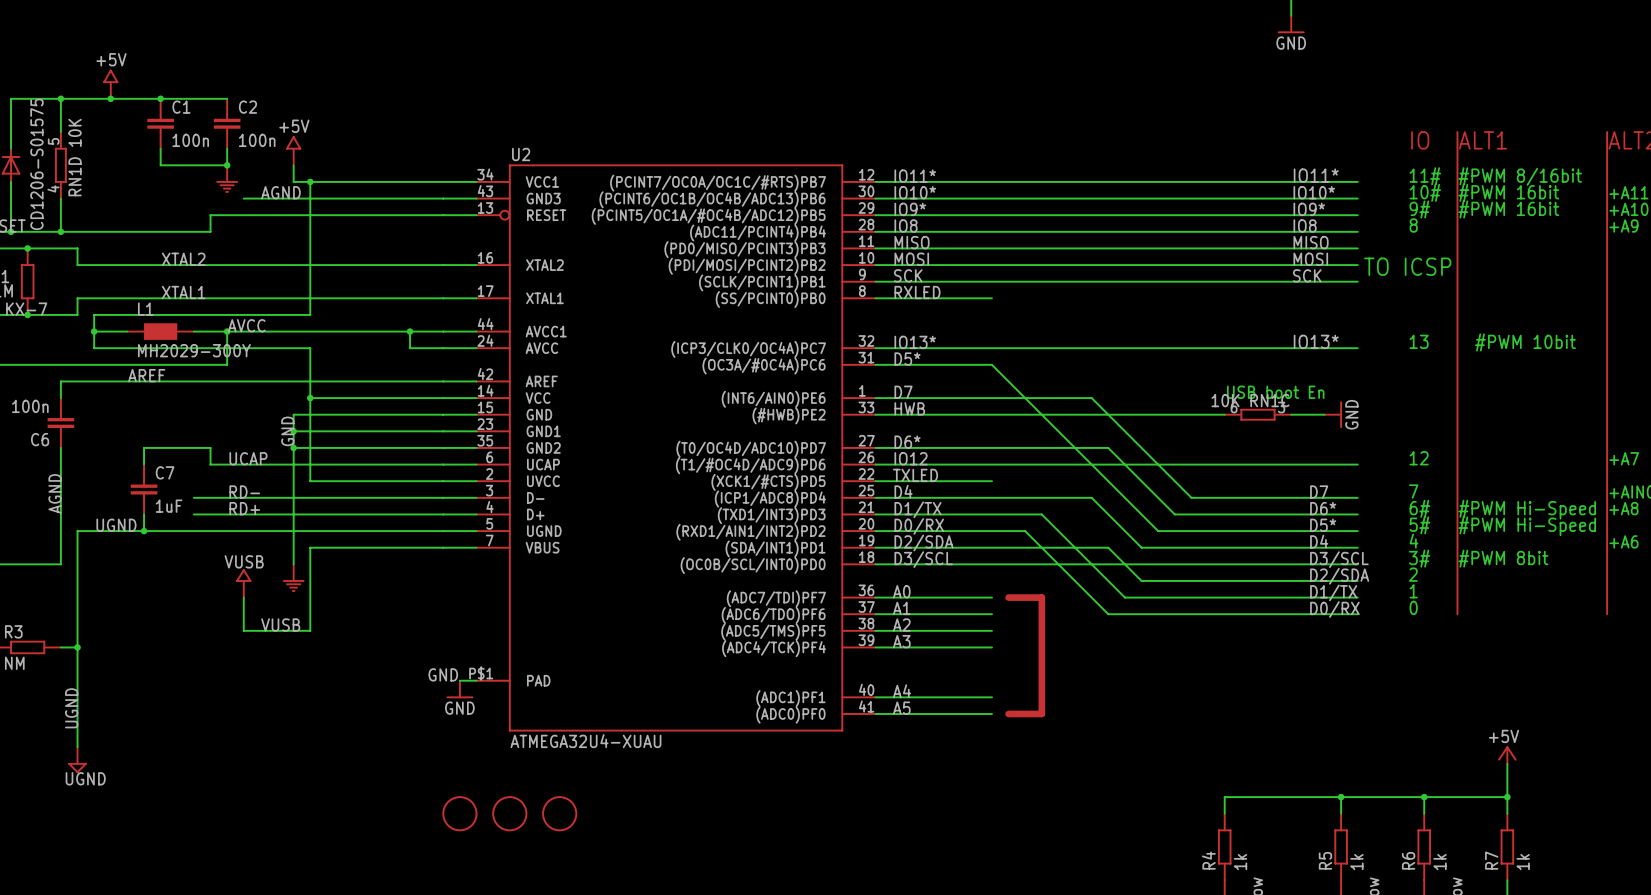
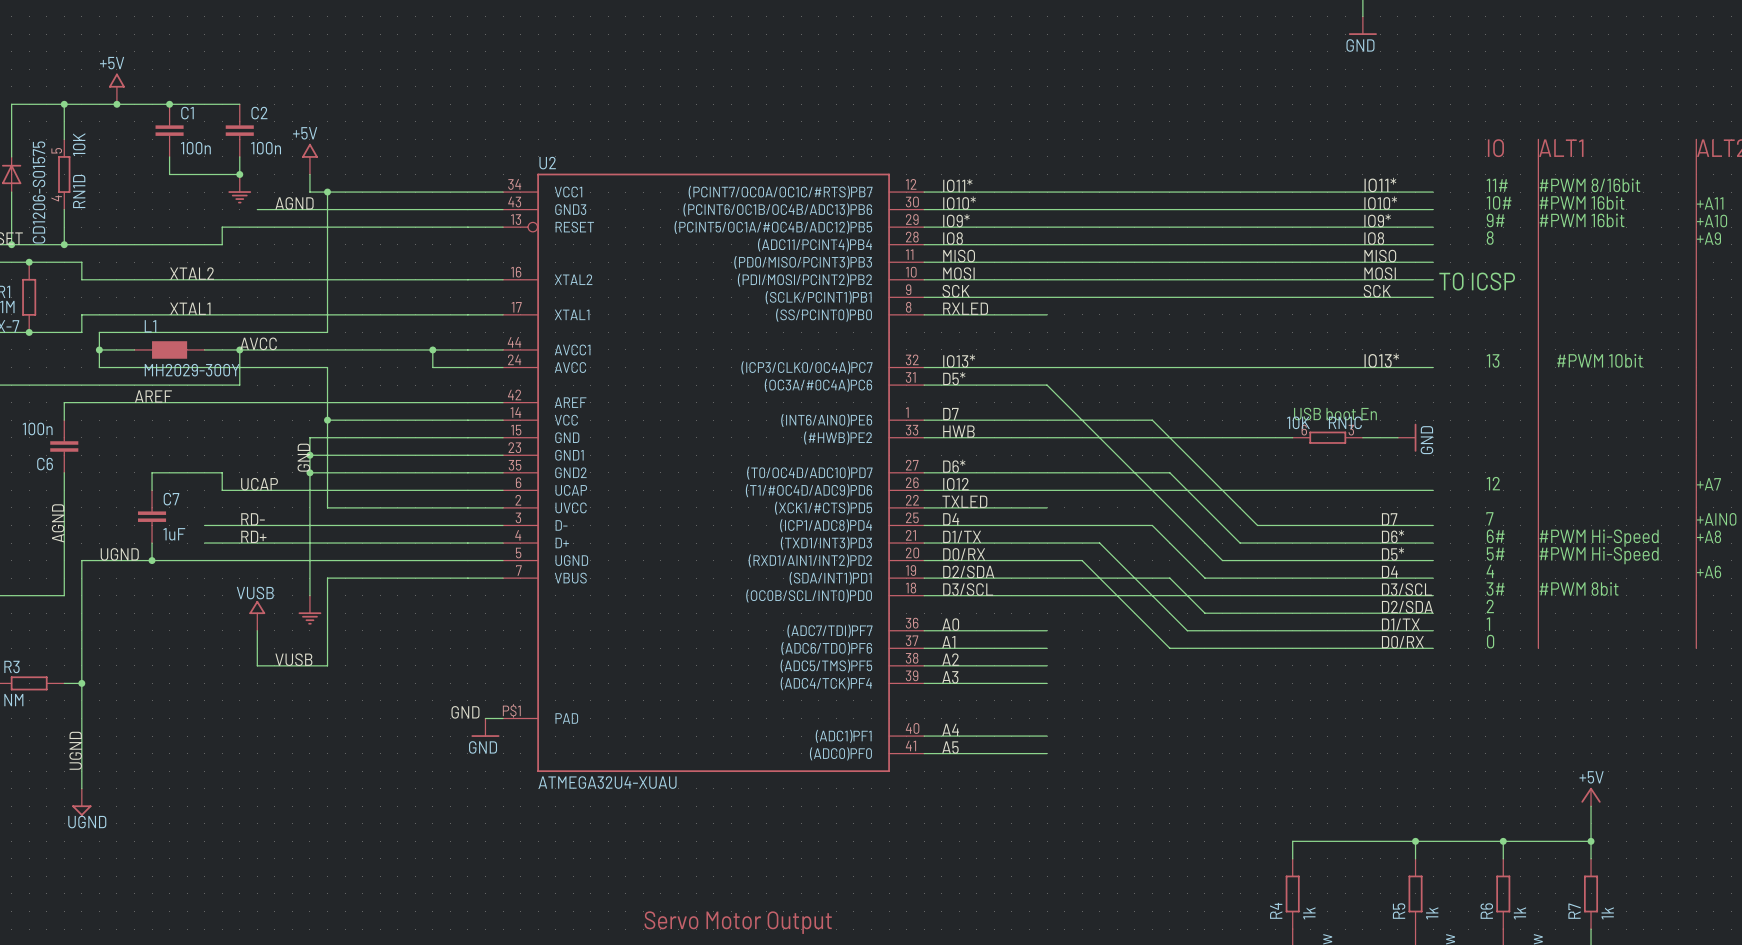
line: (1008, 597) (1041, 597) (1041, 713) (1008, 713) -> none
part: (459, 813) -> none
part: (509, 813) -> none
part: (559, 813) -> none
text: none -> Servo Motor Output (738, 922)

